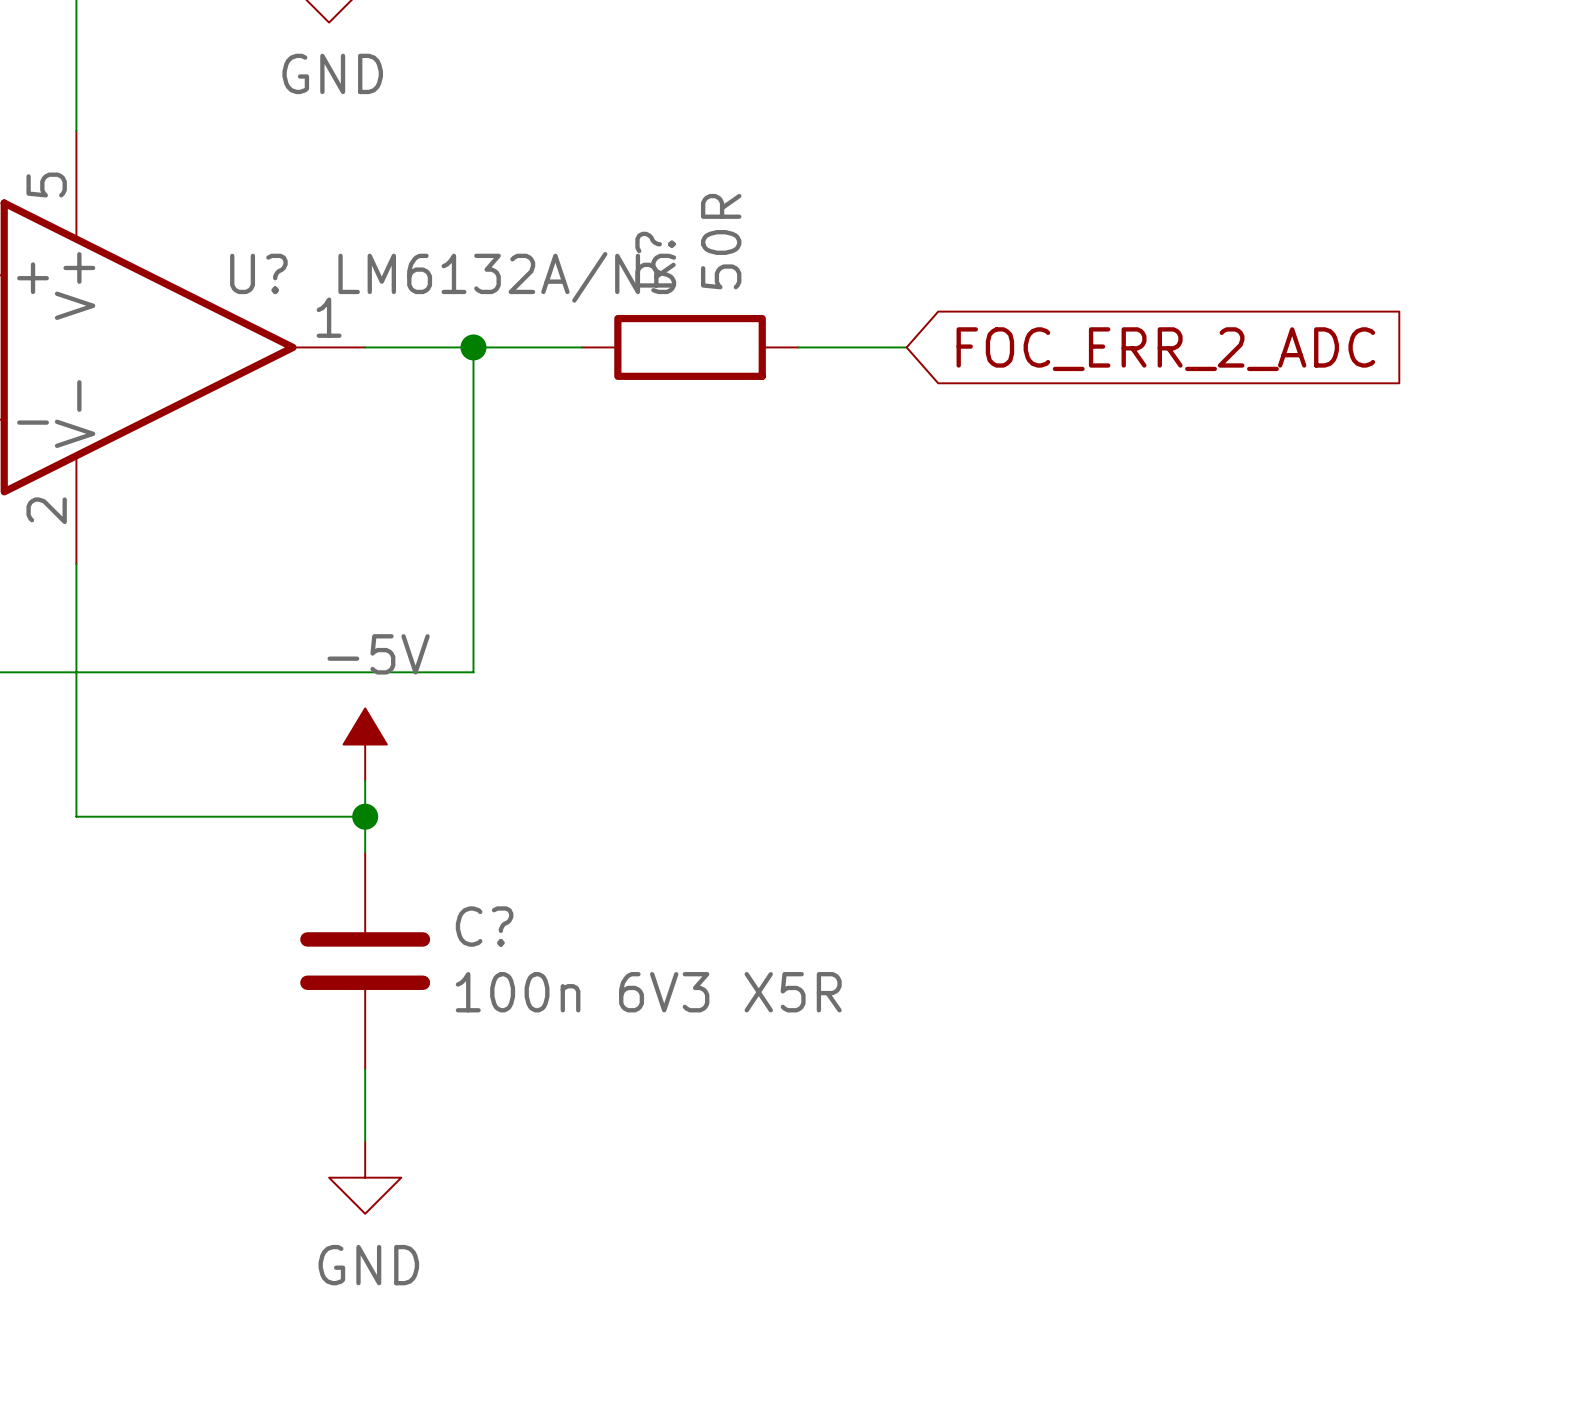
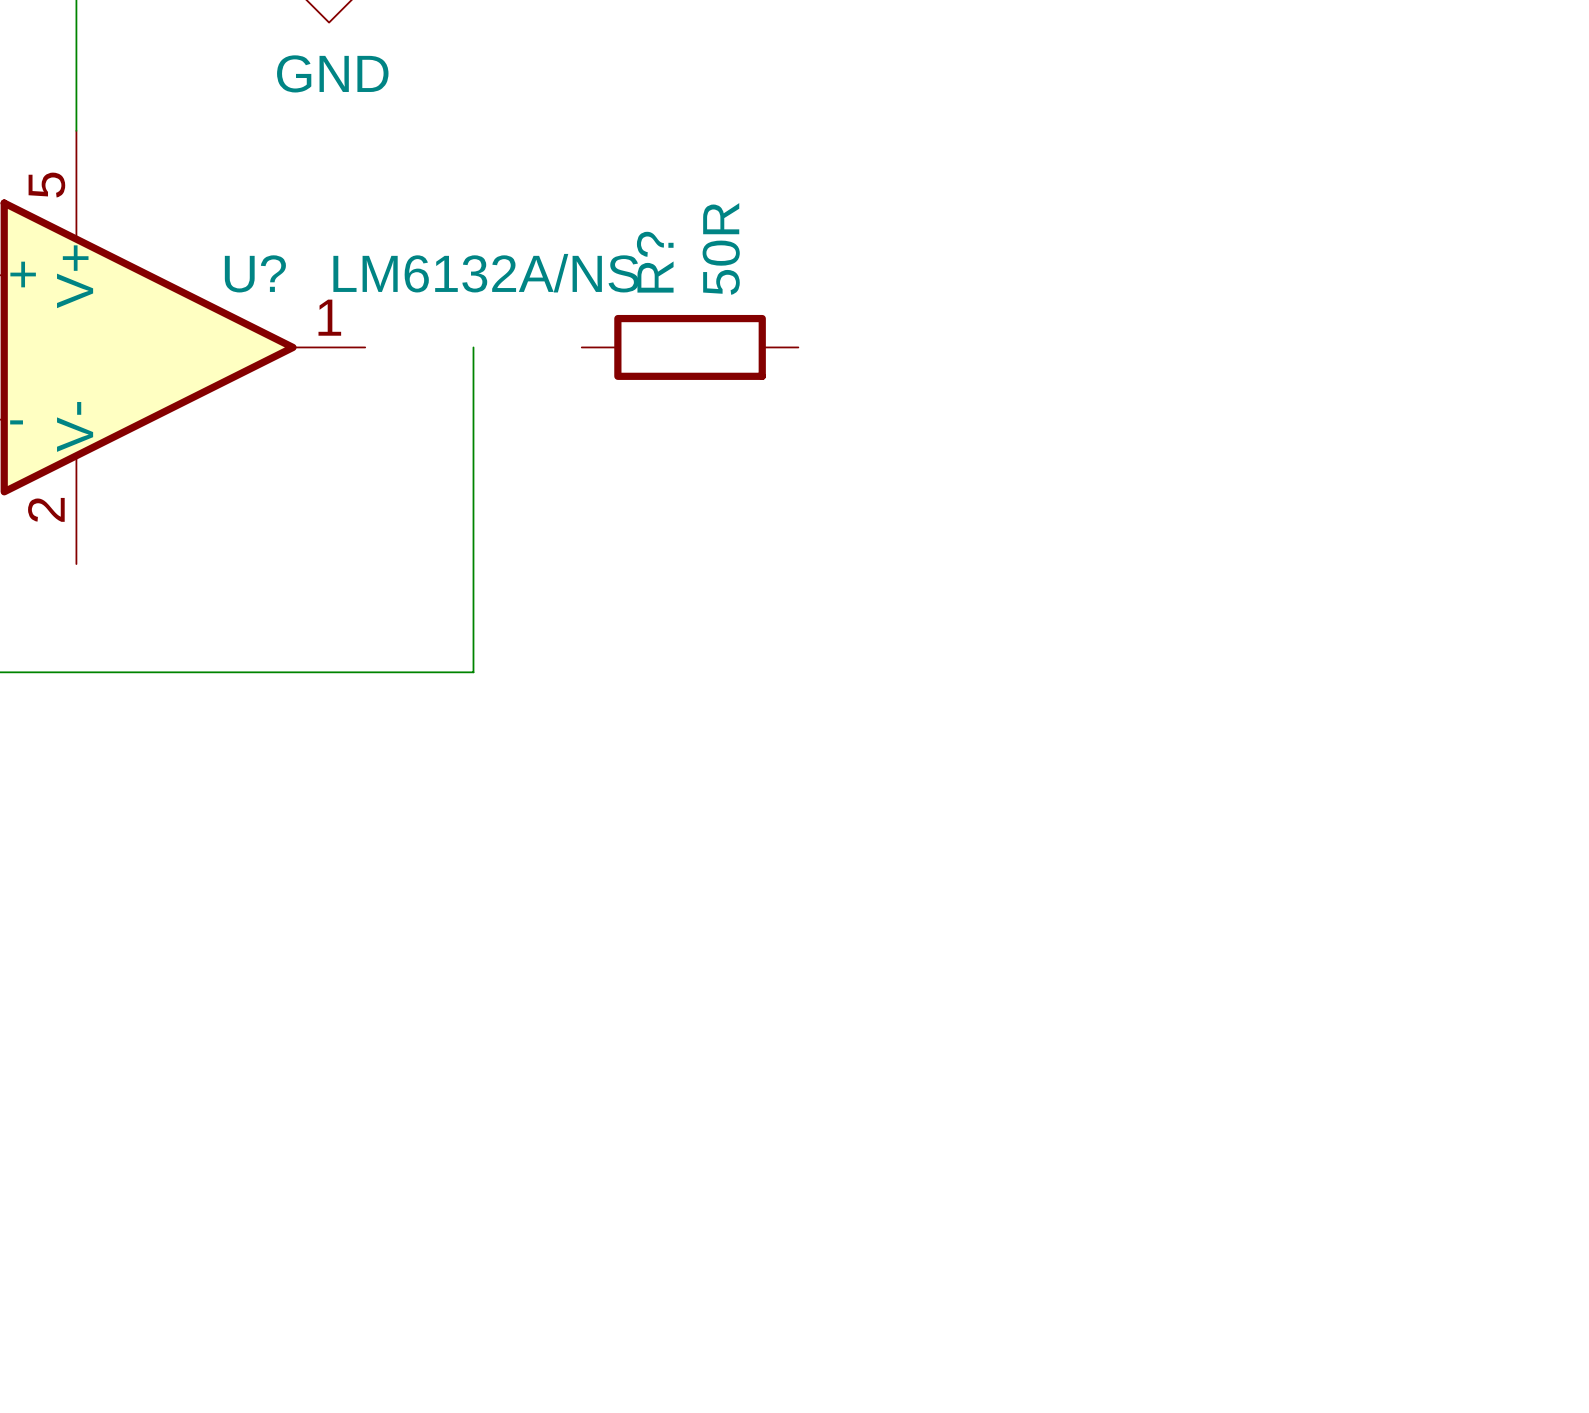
wire: (365, 347) (581, 347) -> none
junction: (473, 347) -> none
wire: (798, 347) (906, 347) -> none
global label: FOC_ERR_2_ADC (1165, 349) -> none
wire: (76, 564) (76, 816) (365, 816) -> none
power symbol: -5V (365, 744) -> none
wire: (365, 780) (365, 852) -> none
junction: (365, 816) -> none
C?: 100n 6V3 X5R (365, 961) -> none
wire: (365, 1069) (365, 1141) -> none
power symbol: GND (365, 1177) -> none

